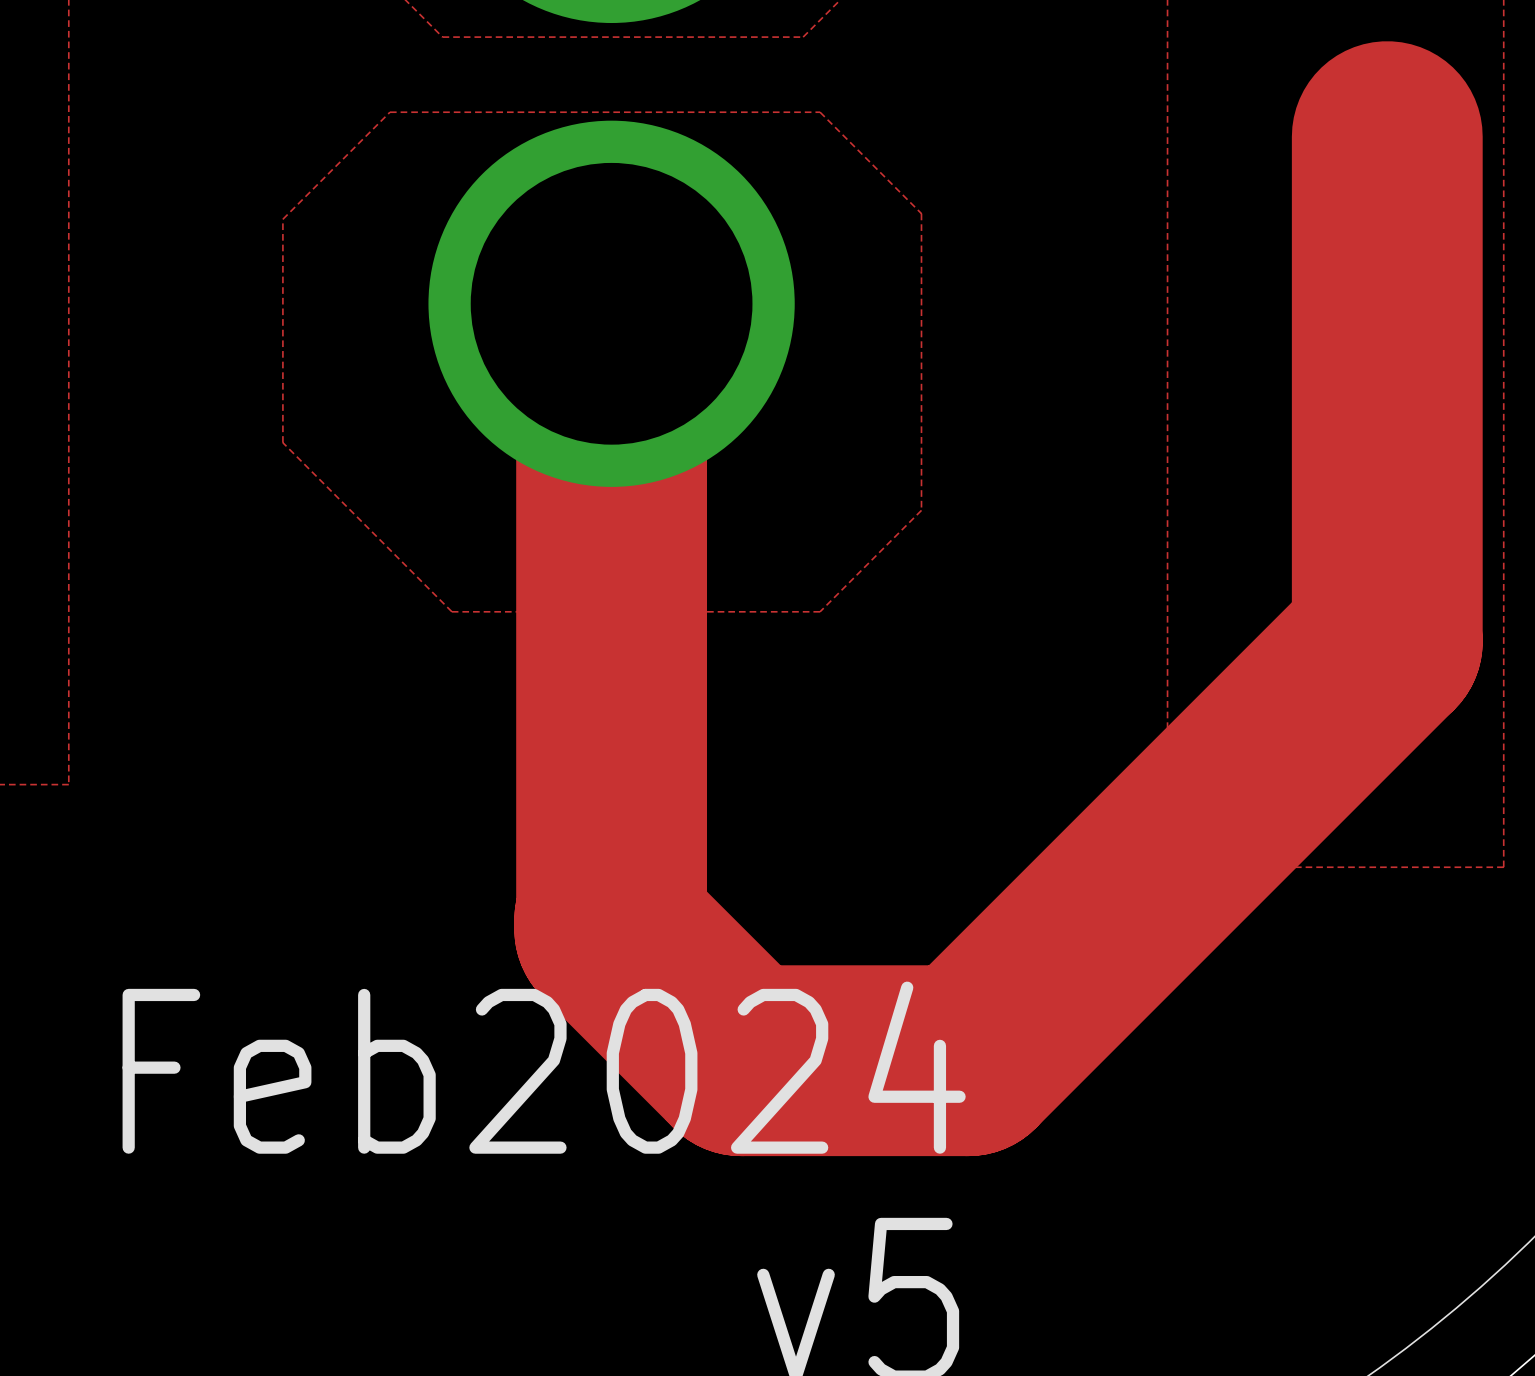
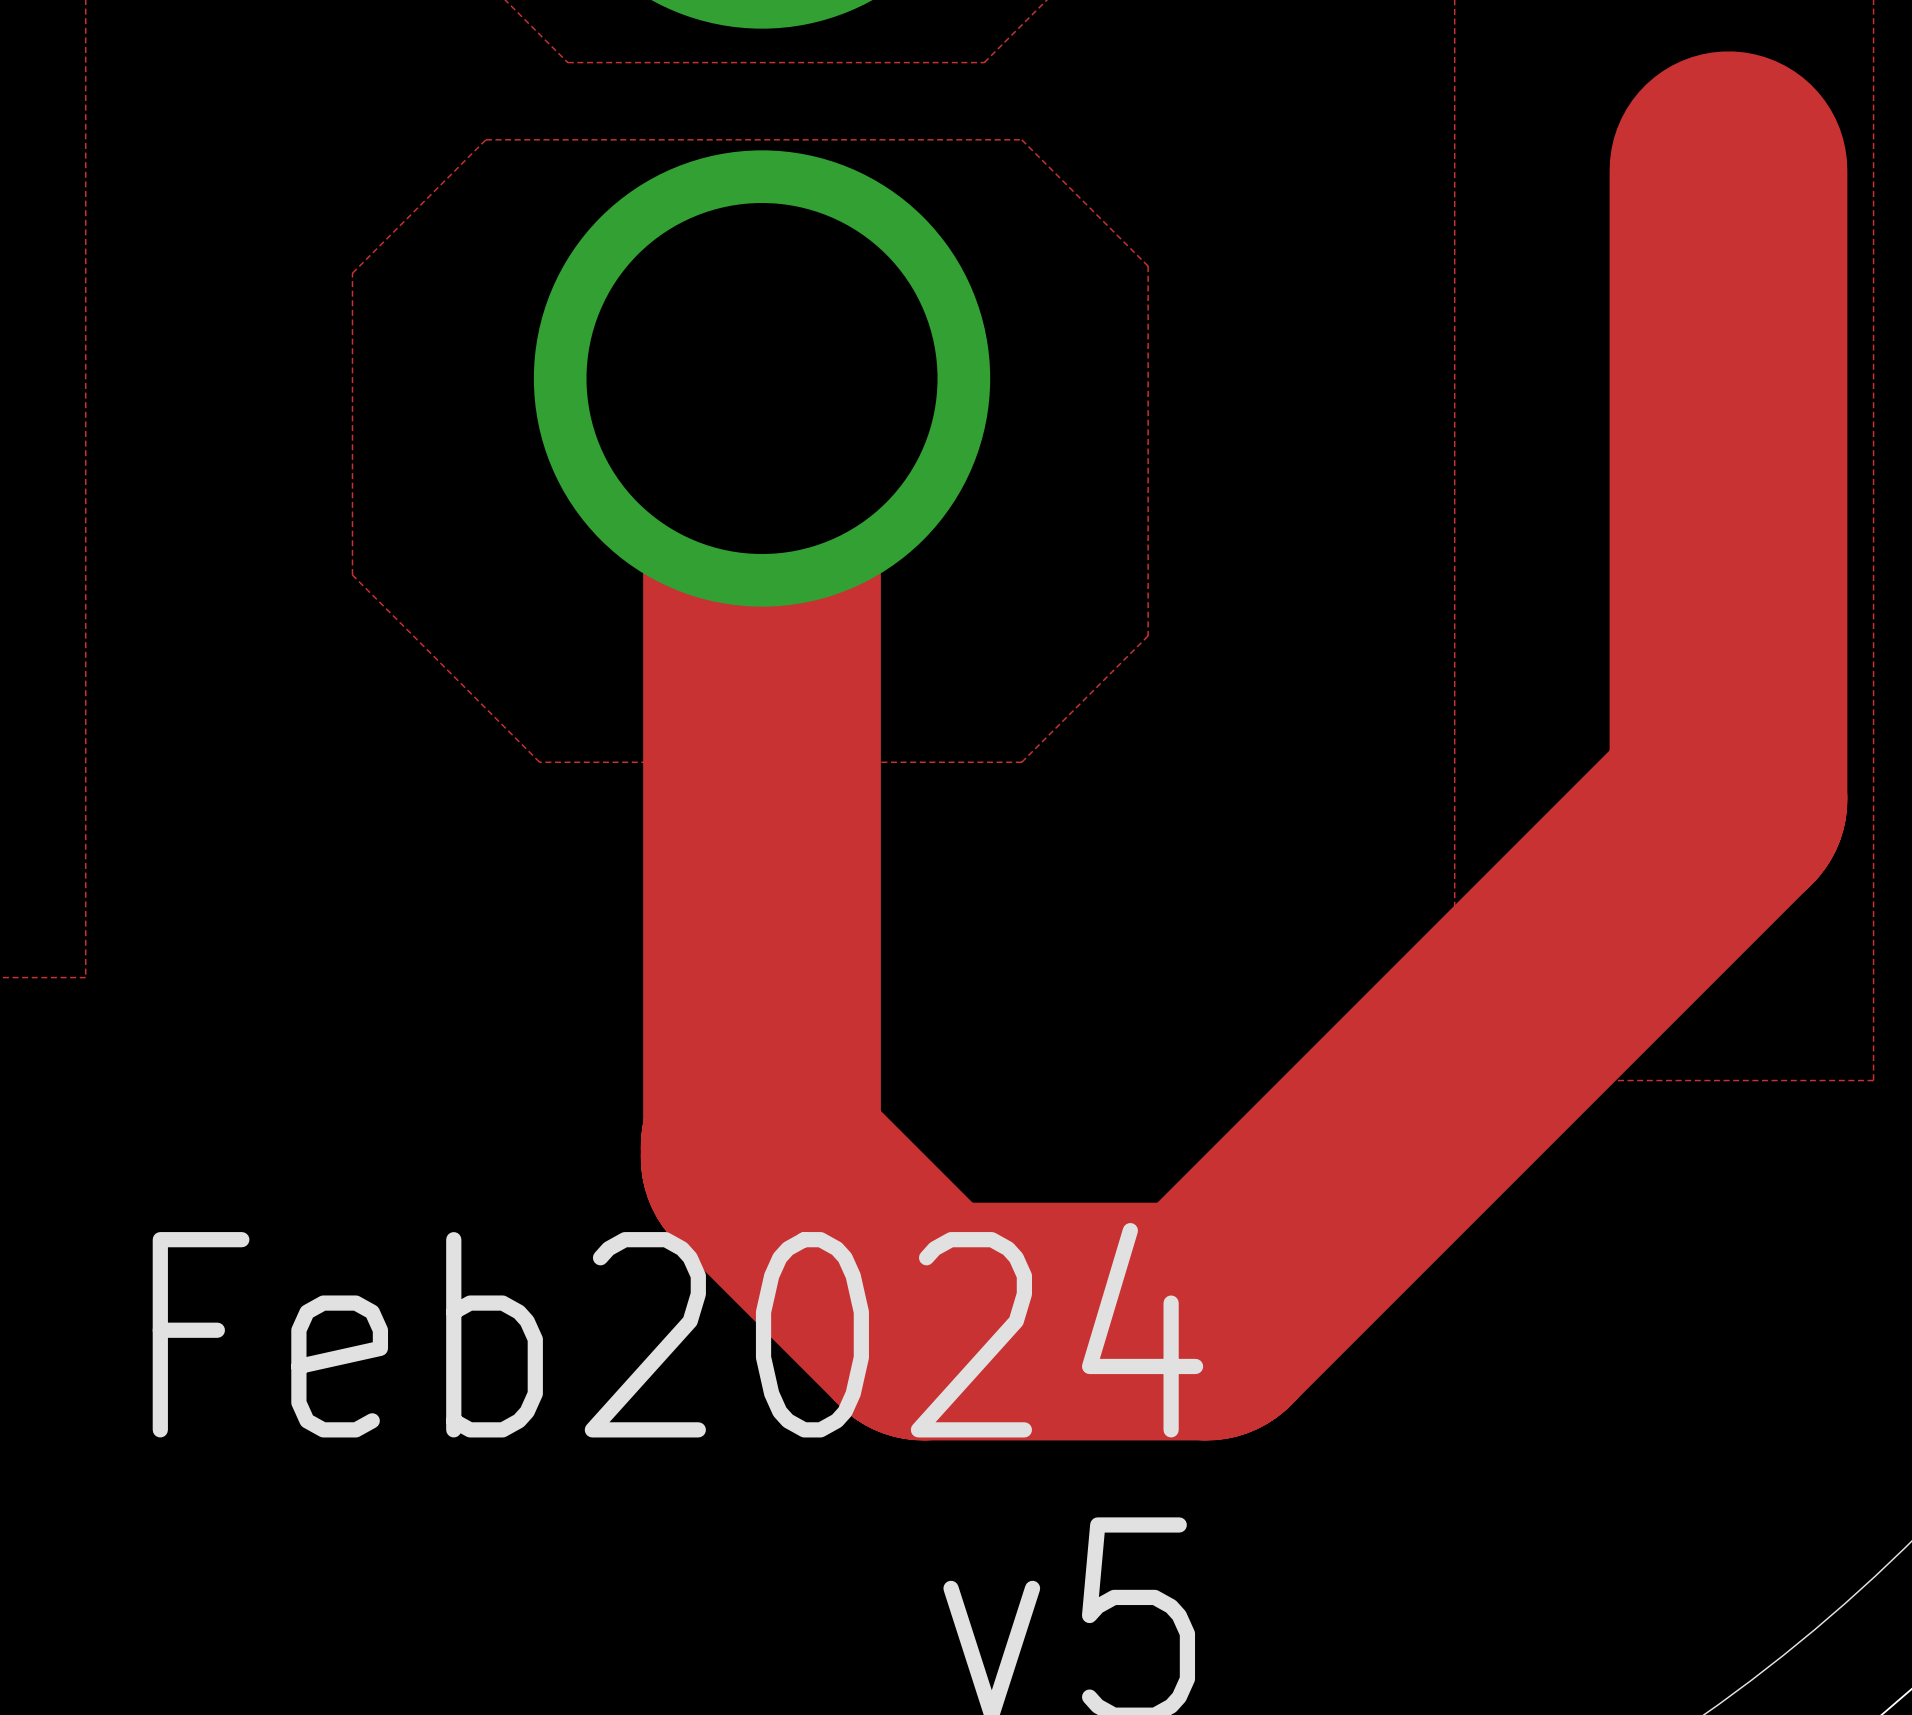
zone outline: (442, 37) (803, 37) -> (551, 46) (567, 62) (984, 62) (1000, 46)
zone outline: (282, 442) (451, 611) -> (352, 551) (352, 575) (539, 762) (563, 762)

